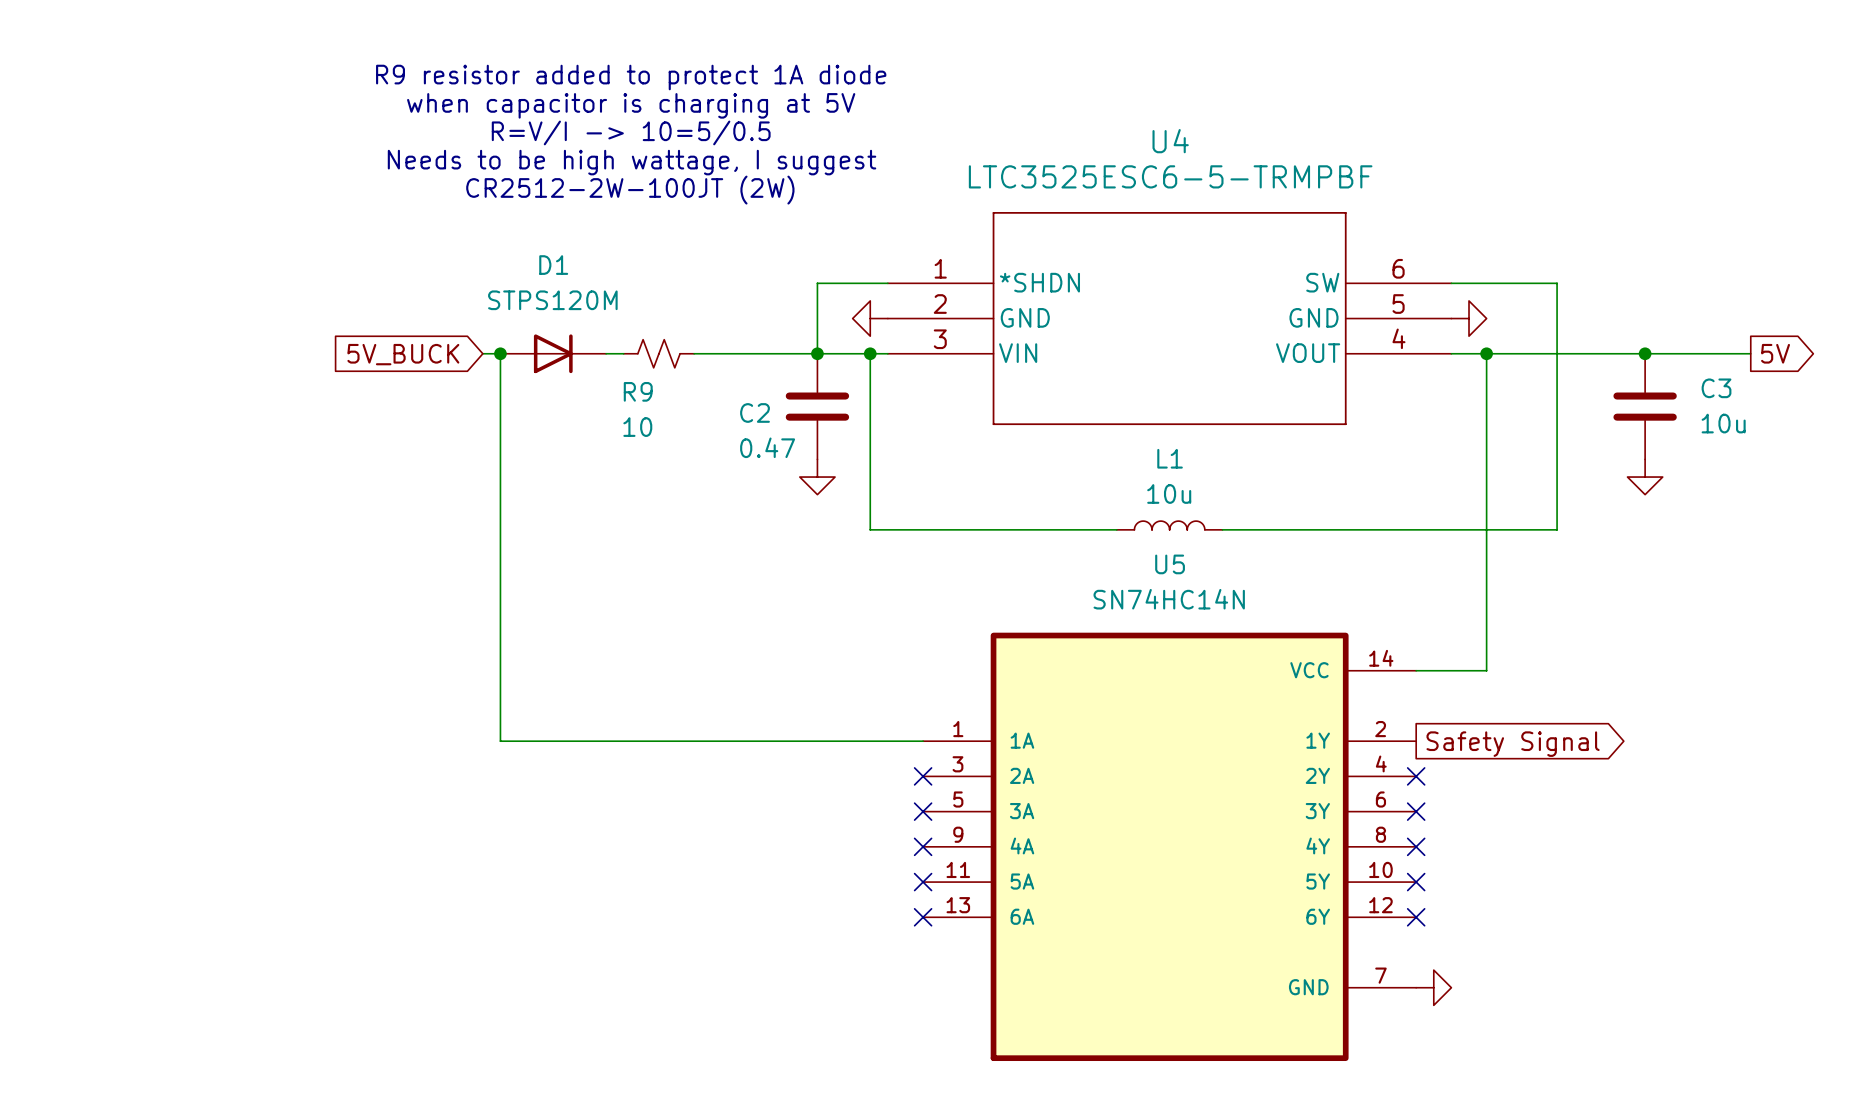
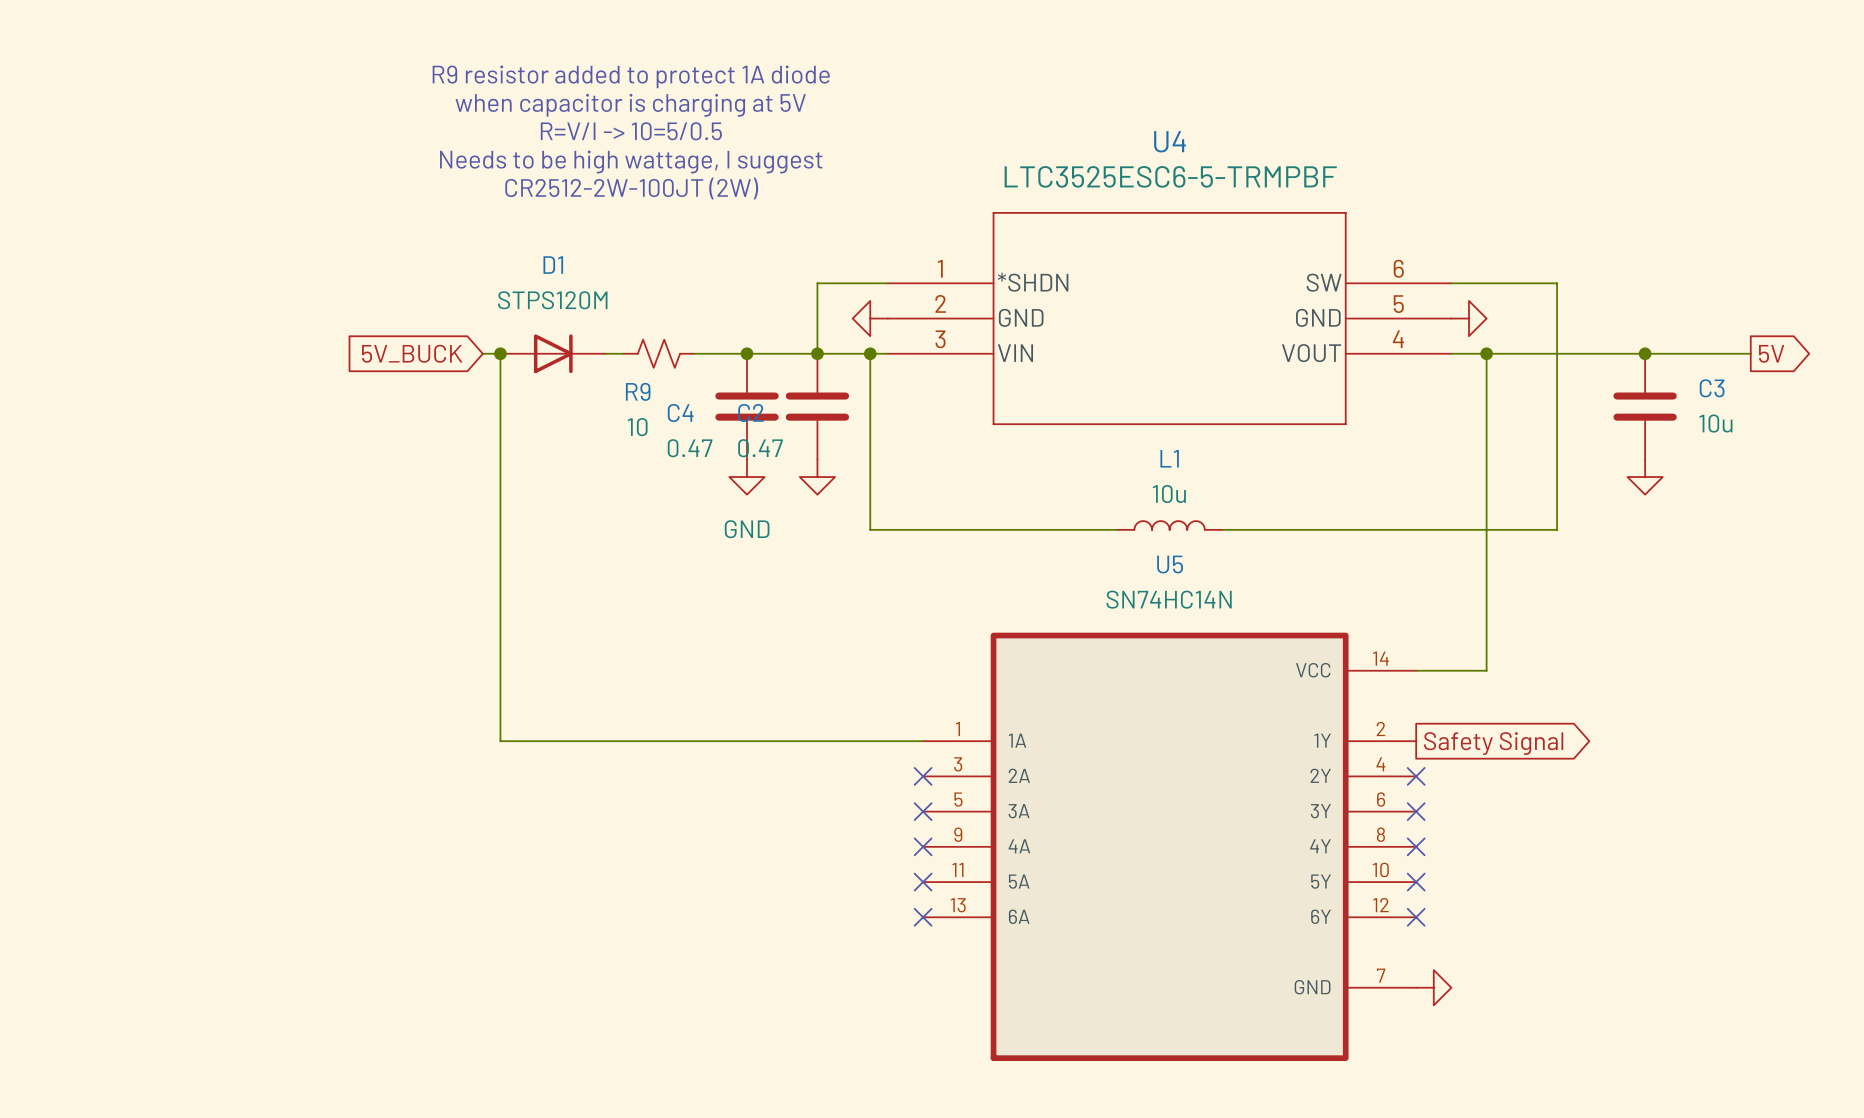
junction: none -> (746, 353)
C4: none -> 0.47 (746, 406)
power symbol: none -> GND (746, 477)

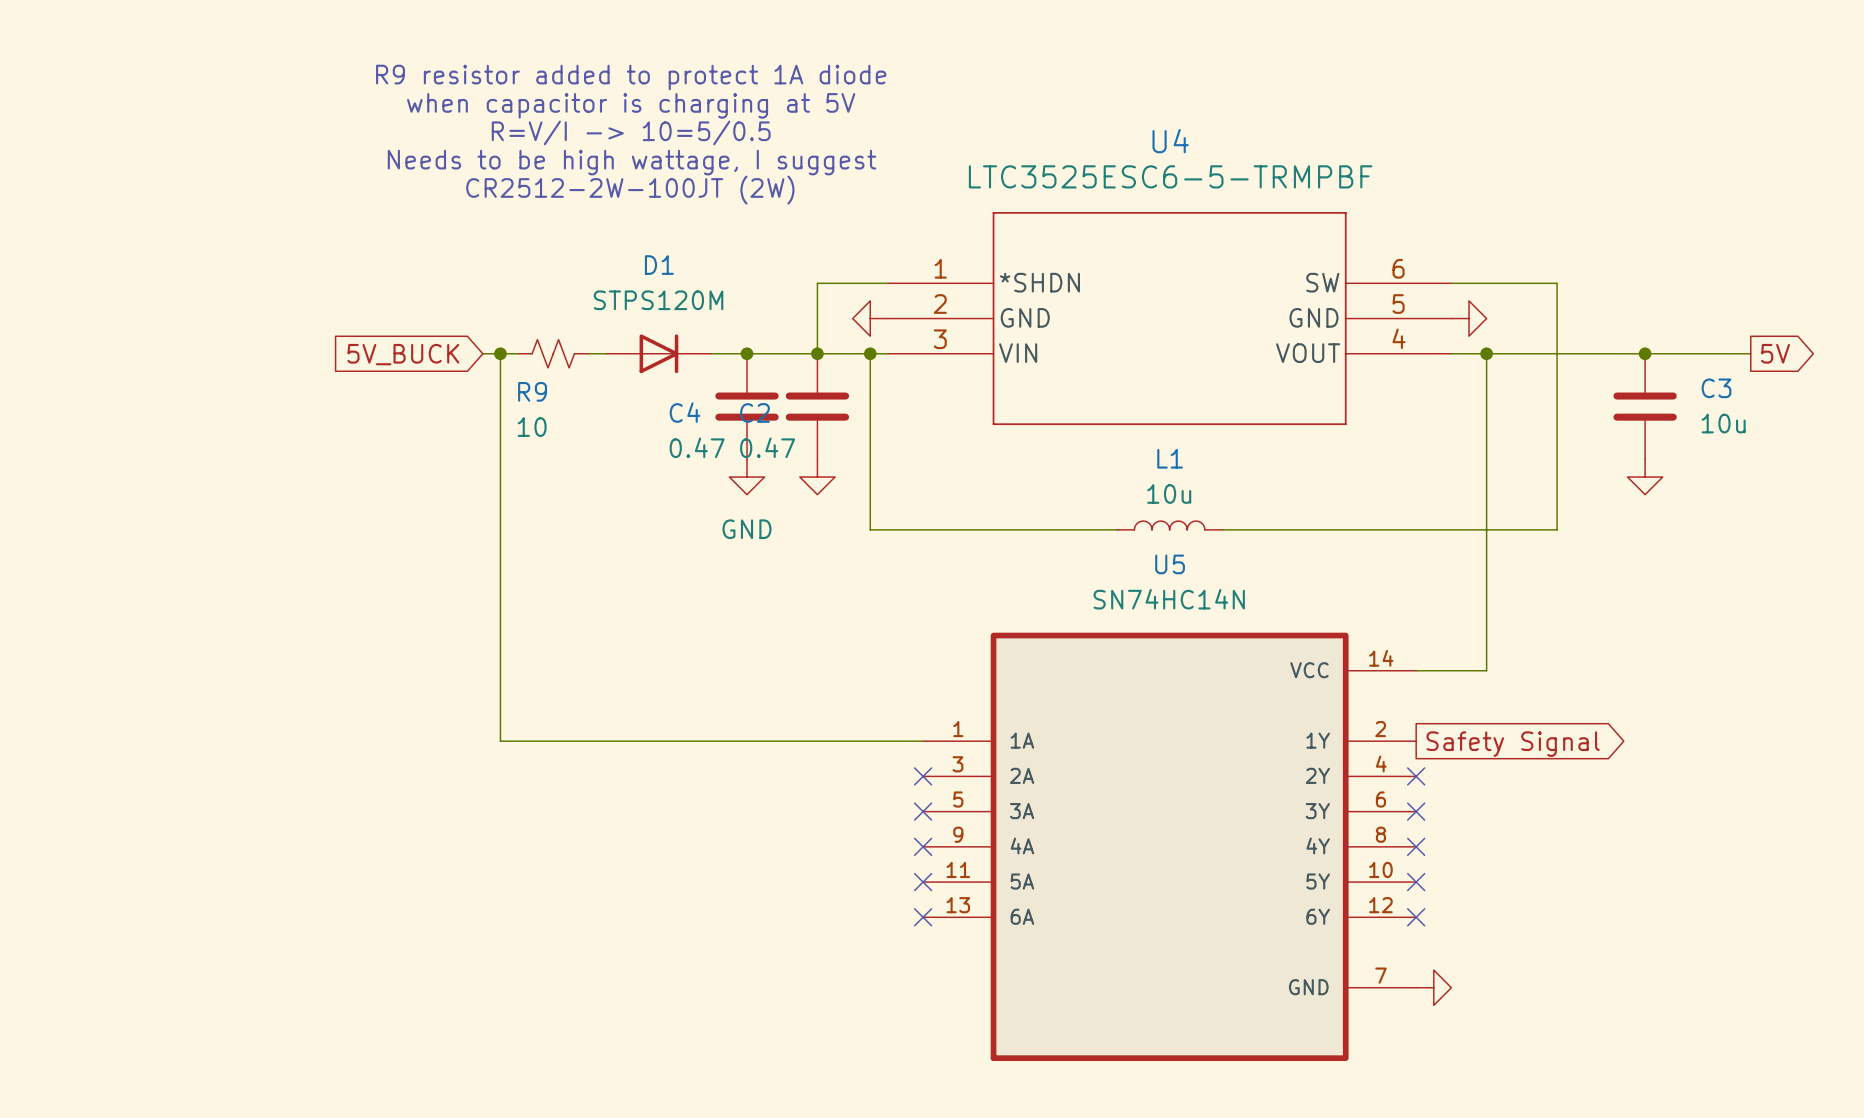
D1 position: (553, 353) -> (658, 353)
R9 position: (658, 353) -> (553, 353)

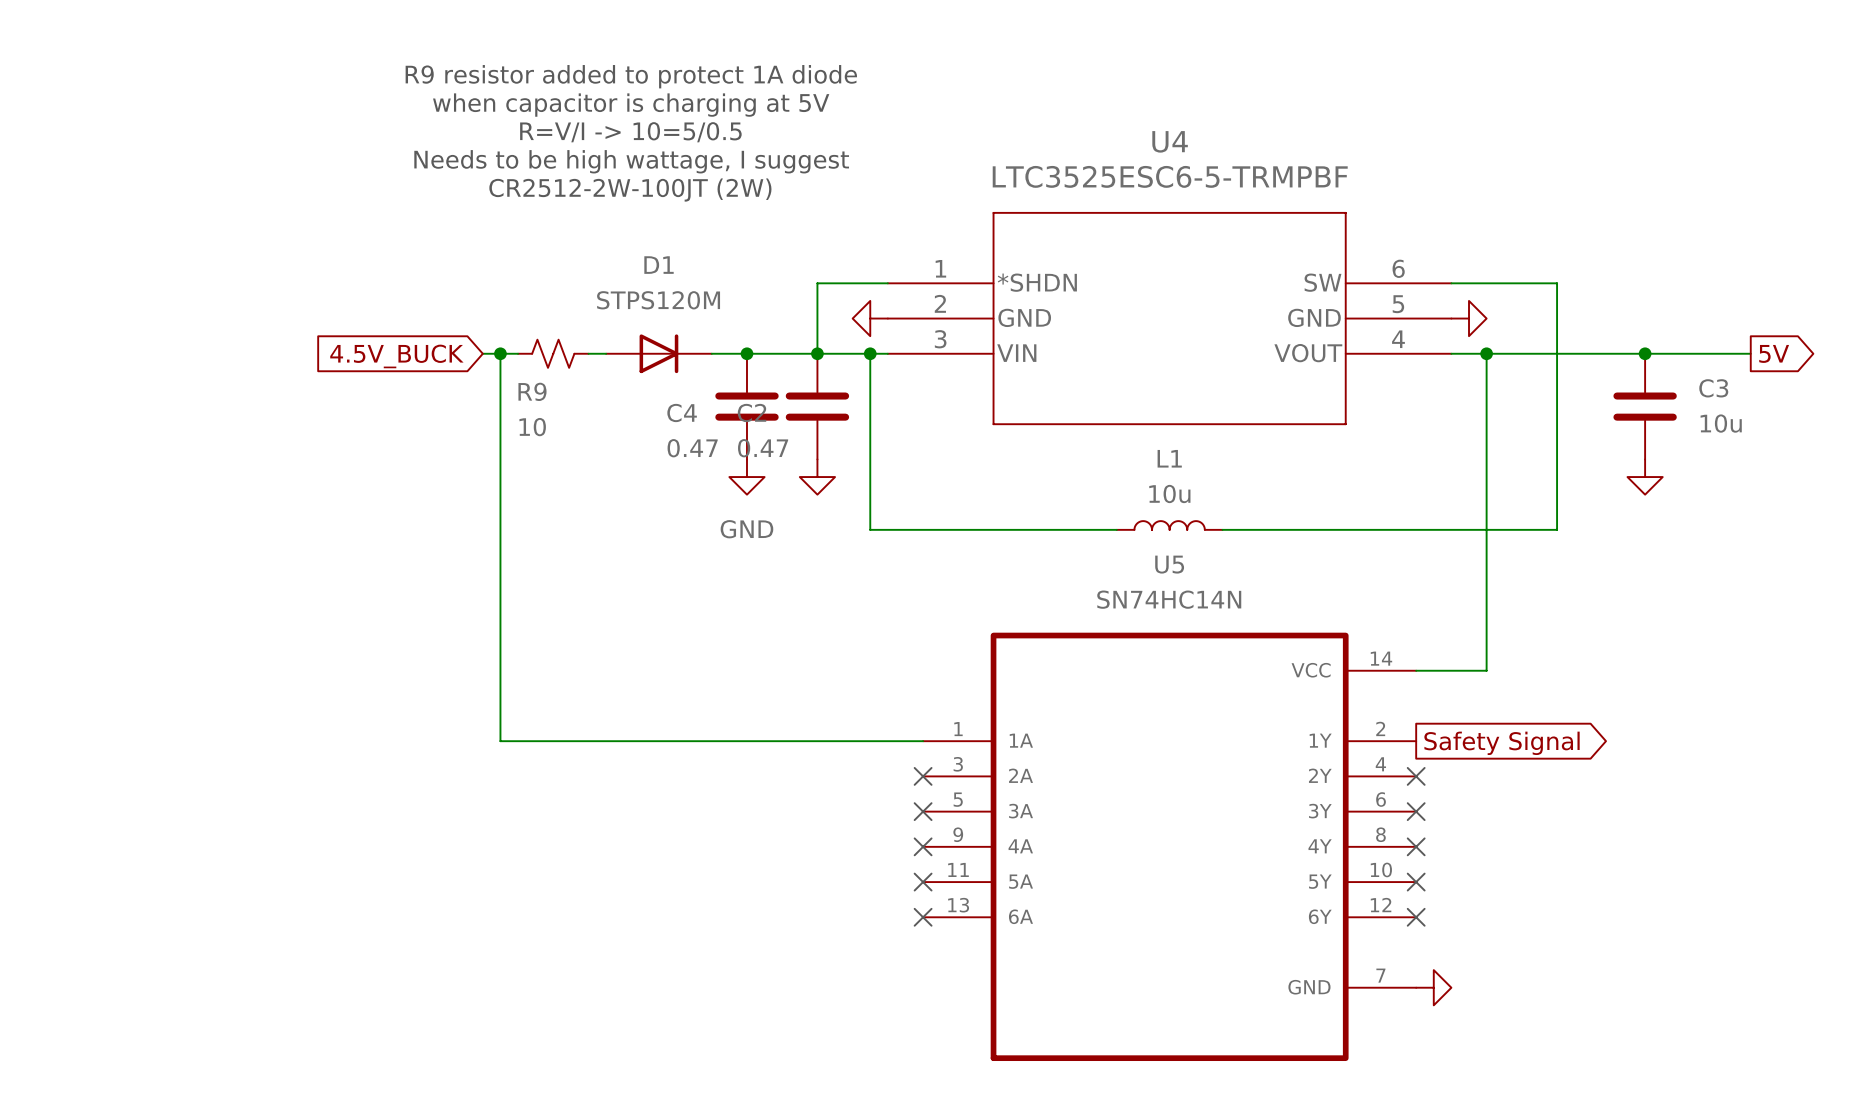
global label: 5V_BUCK (403, 354) -> 4.5V_BUCK (396, 356)

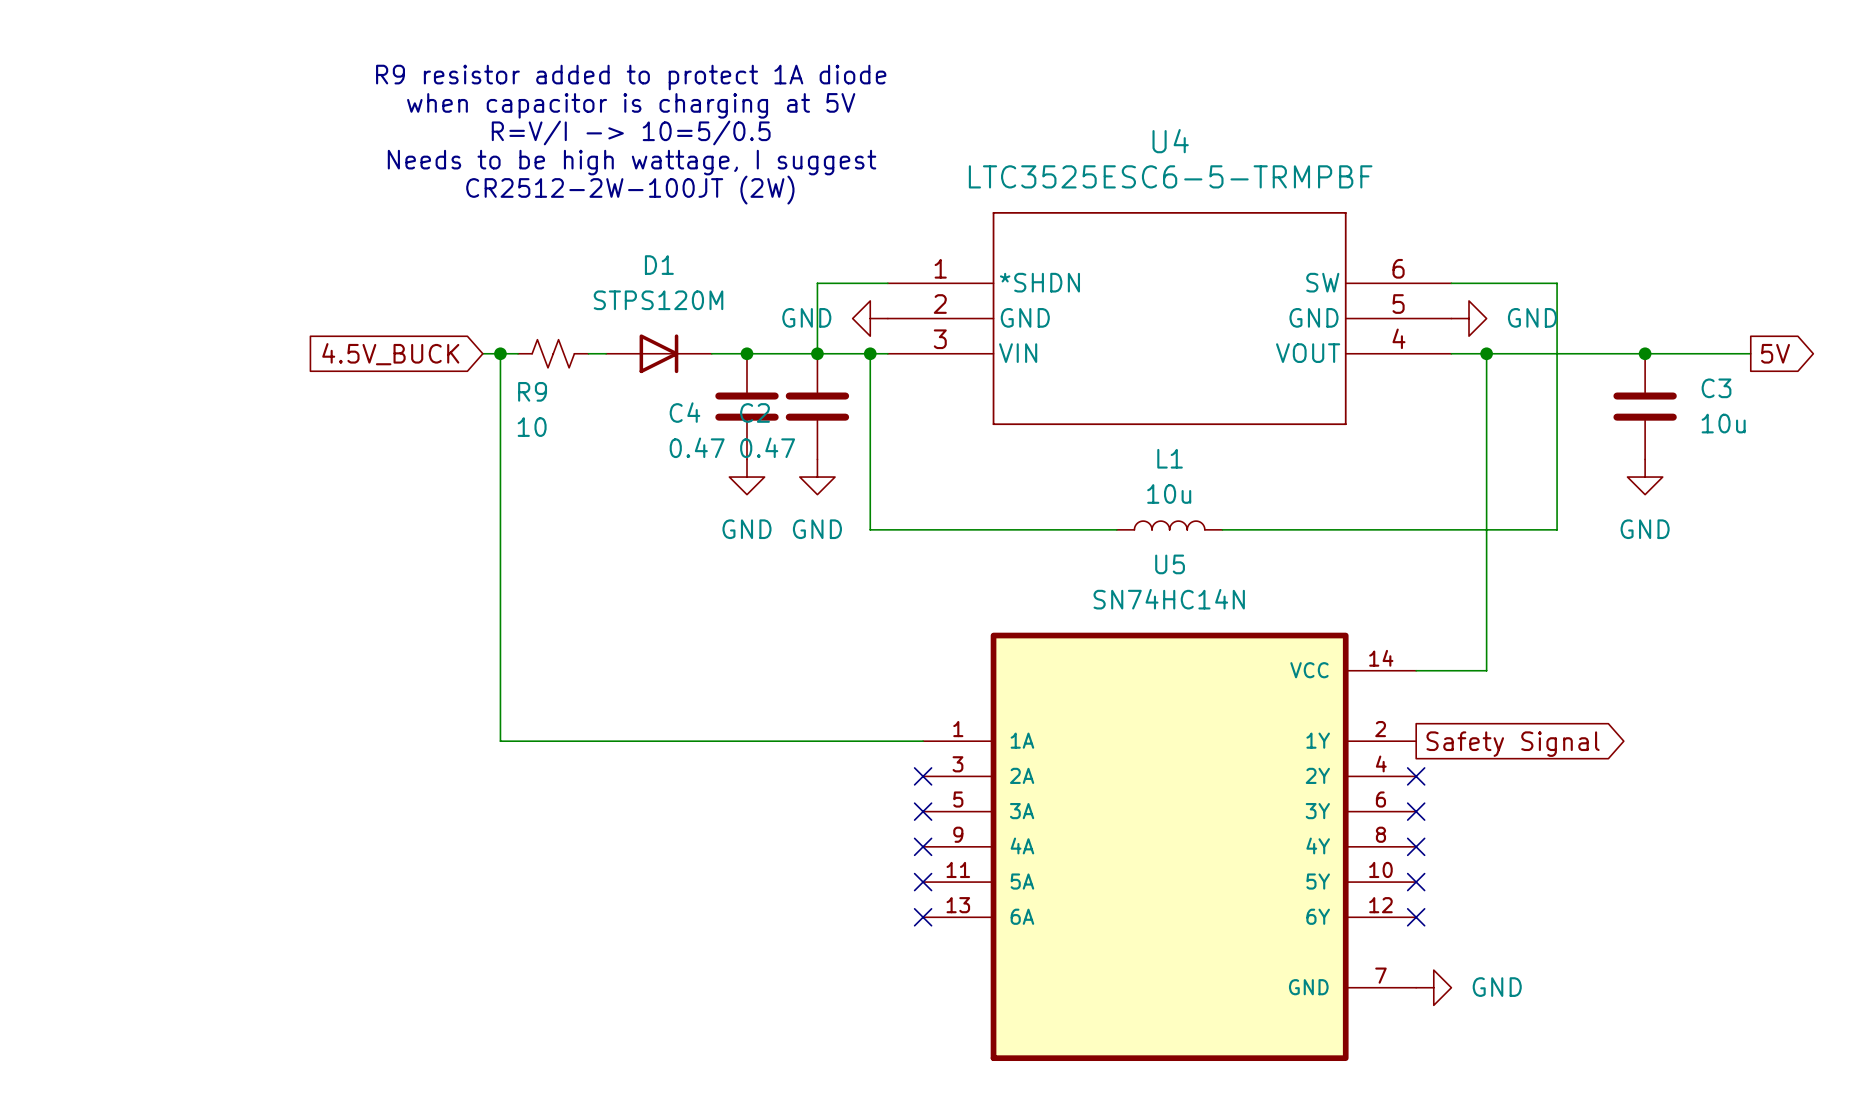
power symbol text: none -> GND (806, 317)
power symbol text: none -> GND (1532, 317)
power symbol text: none -> GND (817, 529)
power symbol text: none -> GND (1645, 529)
power symbol text: none -> GND (1497, 987)

